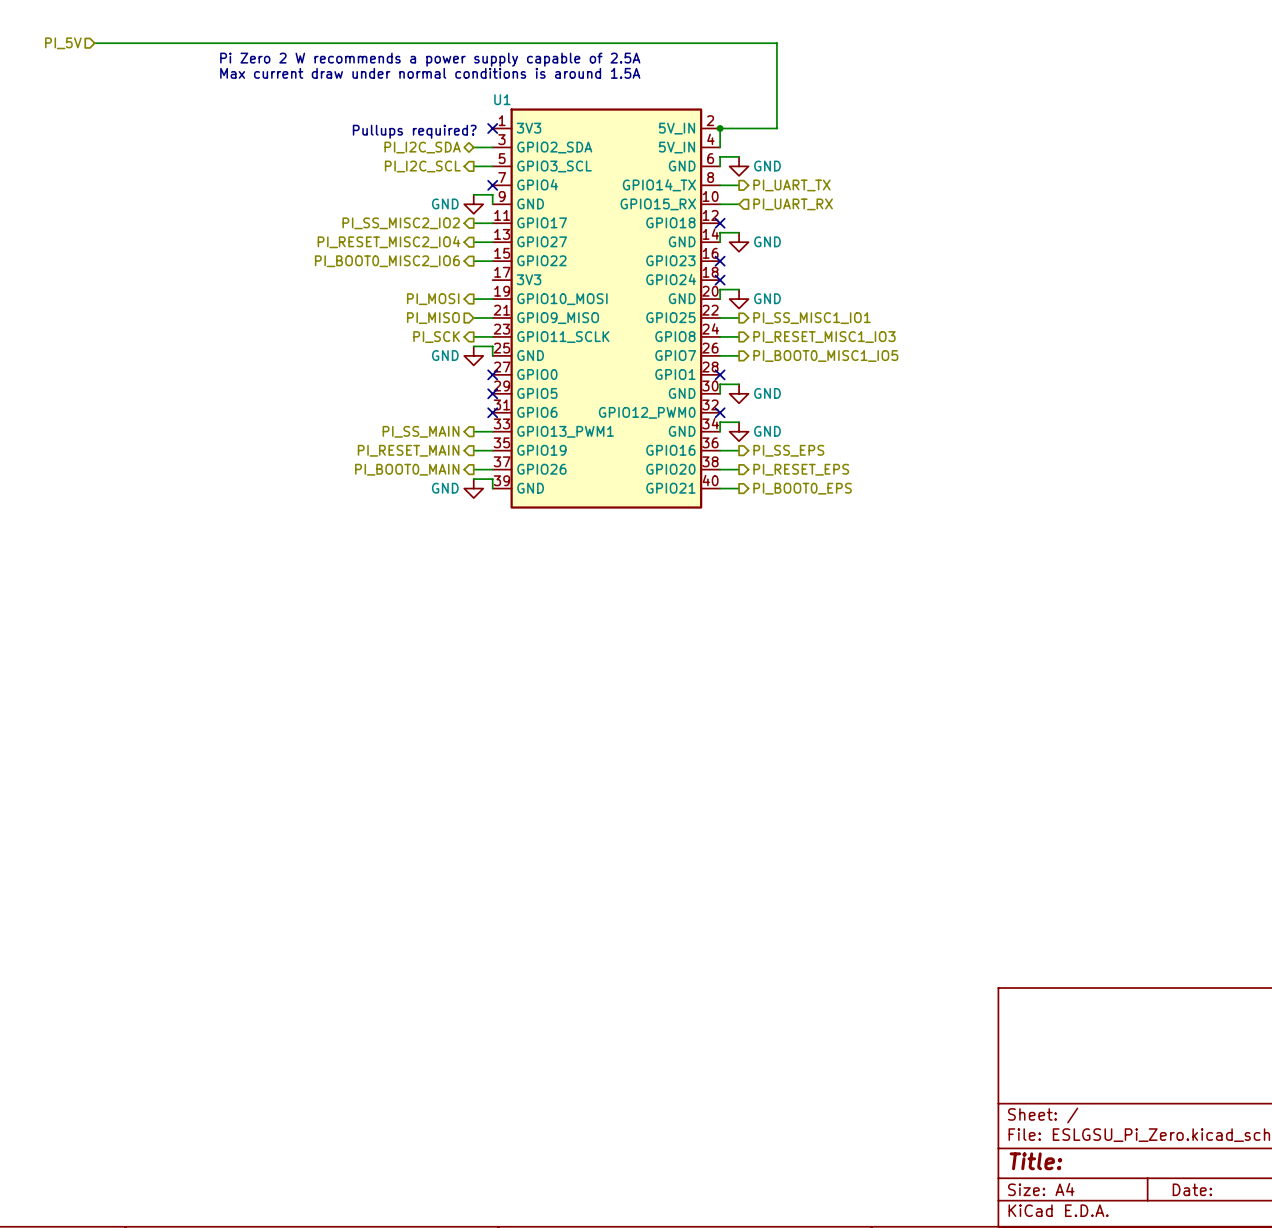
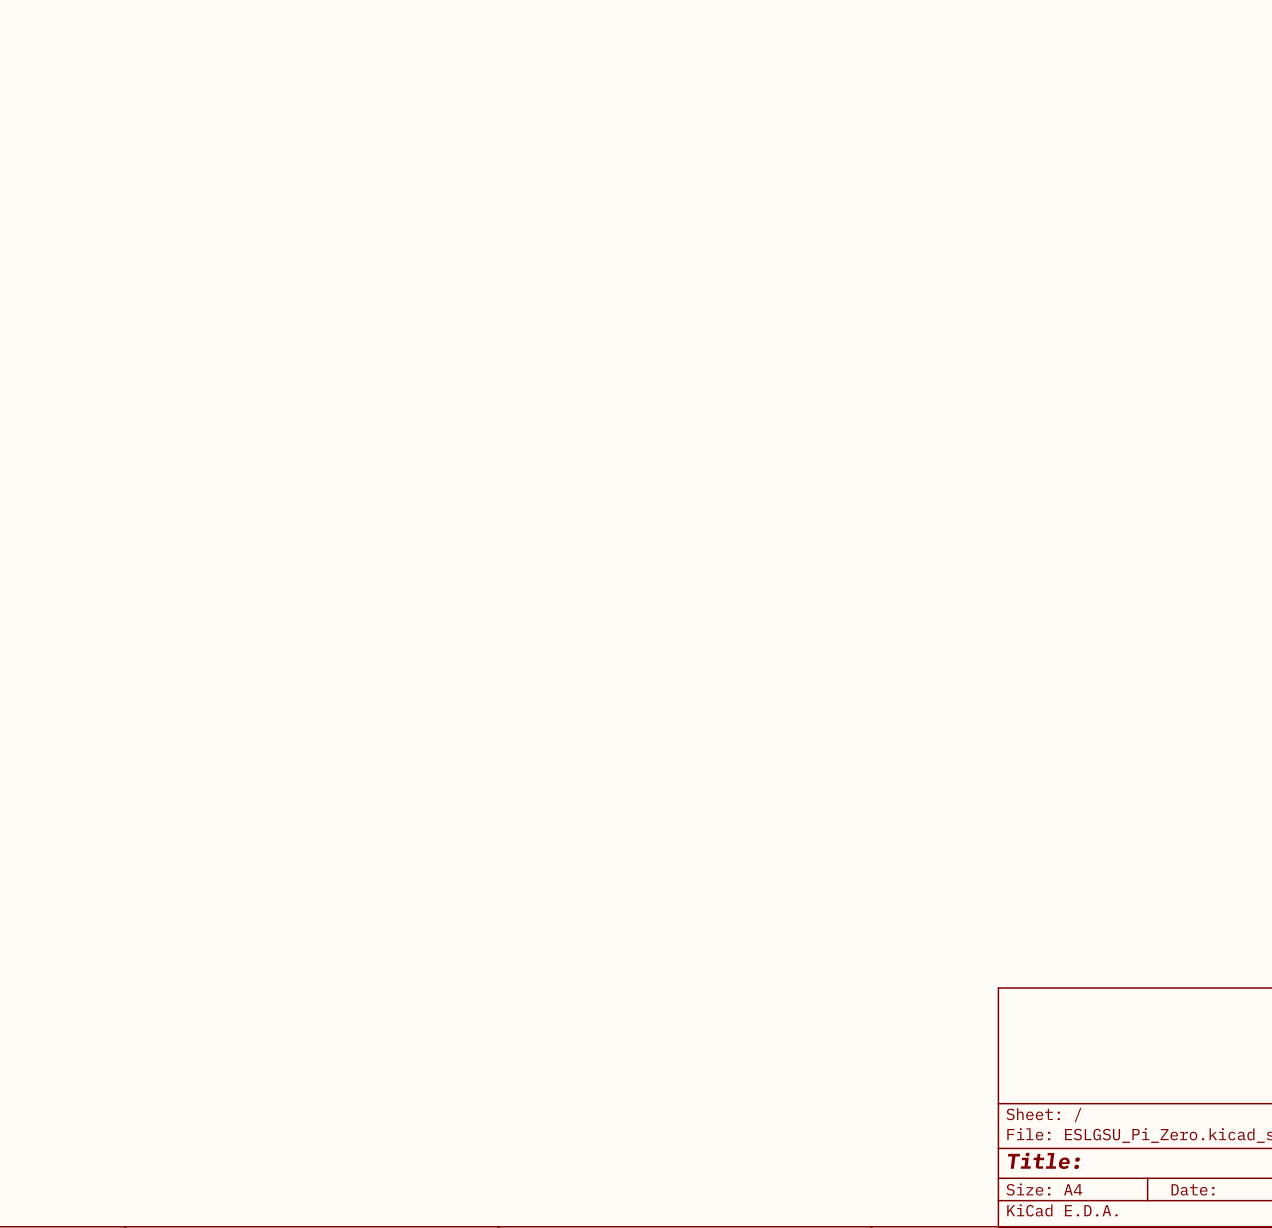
hierarchical label: PI_5V (63, 43) -> none
wire: (94, 43) (776, 43) (776, 128) (720, 128) (720, 147) -> none
text: Pi Zero 2 W recommends a power supply capable of 2.5A (430, 59) -> none
text: Max current draw under normal conditions is around 1.5A (430, 73) -> none
no-connect mark: (492, 128) -> none
junction: (720, 128) -> none
text: Pullups required? (414, 131) -> none
hierarchical label: PI_I2C_SDA (422, 147) -> none
wire: (473, 147) (492, 147) -> none
wire: (739, 156) (720, 156) (720, 166) -> none
hierarchical label: PI_I2C_SCL (422, 166) -> none
wire: (473, 166) (492, 166) -> none
power symbol: GND (739, 166) -> none
no-connect mark: (492, 185) -> none
wire: (720, 185) (739, 185) -> none
hierarchical label: PI_UART_TX (791, 185) -> none
wire: (473, 194) (492, 194) (492, 204) -> none
power symbol: GND (473, 204) -> none
wire: (720, 204) (739, 204) -> none
hierarchical label: PI_UART_RX (793, 204) -> none
hierarchical label: PI_SS_MISC2_IO2 (401, 223) -> none
wire: (473, 223) (492, 223) -> none
no-connect mark: (720, 223) -> none
wire: (739, 232) (720, 232) (720, 242) -> none
hierarchical label: PI_RESET_MISC2_IO4 (388, 242) -> none
wire: (473, 242) (492, 242) -> none
power symbol: GND (739, 242) -> none
hierarchical label: PI_BOOT0_MISC2_IO6 (387, 261) -> none
wire: (473, 261) (492, 261) -> none
no-connect mark: (720, 261) -> none
no-connect mark: (720, 280) -> none
wire: (739, 289) (720, 289) (720, 299) -> none
hierarchical label: PI_MOSI (433, 299) -> none
wire: (473, 299) (492, 299) -> none
power symbol: GND (739, 299) -> none
U1: (606, 308) -> none
hierarchical label: PI_MISO (433, 318) -> none
wire: (473, 318) (492, 318) -> none
wire: (720, 318) (739, 318) -> none
hierarchical label: PI_SS_MISC1_IO1 (812, 318) -> none
wire: (473, 336) (492, 336) -> none
wire: (720, 336) (739, 336) -> none
hierarchical label: PI_SCK (436, 337) -> none
hierarchical label: PI_RESET_MISC1_IO3 (824, 337) -> none
wire: (473, 346) (492, 346) (492, 355) -> none
power symbol: GND (473, 355) -> none
wire: (720, 355) (739, 355) -> none
hierarchical label: PI_BOOT0_MISC1_IO5 (825, 356) -> none
no-connect mark: (492, 374) -> none
no-connect mark: (720, 374) -> none
wire: (739, 384) (720, 384) (720, 393) -> none
no-connect mark: (492, 393) -> none
power symbol: GND (739, 393) -> none
no-connect mark: (492, 412) -> none
no-connect mark: (720, 412) -> none
wire: (739, 422) (720, 422) (720, 431) -> none
hierarchical label: PI_SS_MAIN (421, 431) -> none
wire: (473, 431) (492, 431) -> none
power symbol: GND (739, 431) -> none
hierarchical label: PI_RESET_MAIN (408, 450) -> none
wire: (473, 450) (492, 450) -> none
wire: (720, 450) (739, 450) -> none
hierarchical label: PI_SS_EPS (788, 450) -> none
hierarchical label: PI_BOOT0_MAIN (407, 469) -> none
wire: (473, 469) (492, 469) -> none
wire: (720, 469) (739, 469) -> none
hierarchical label: PI_RESET_EPS (801, 469) -> none
wire: (473, 479) (492, 479) (492, 488) -> none
power symbol: GND (473, 488) -> none
wire: (720, 488) (739, 488) -> none
hierarchical label: PI_BOOT0_EPS (802, 488) -> none

